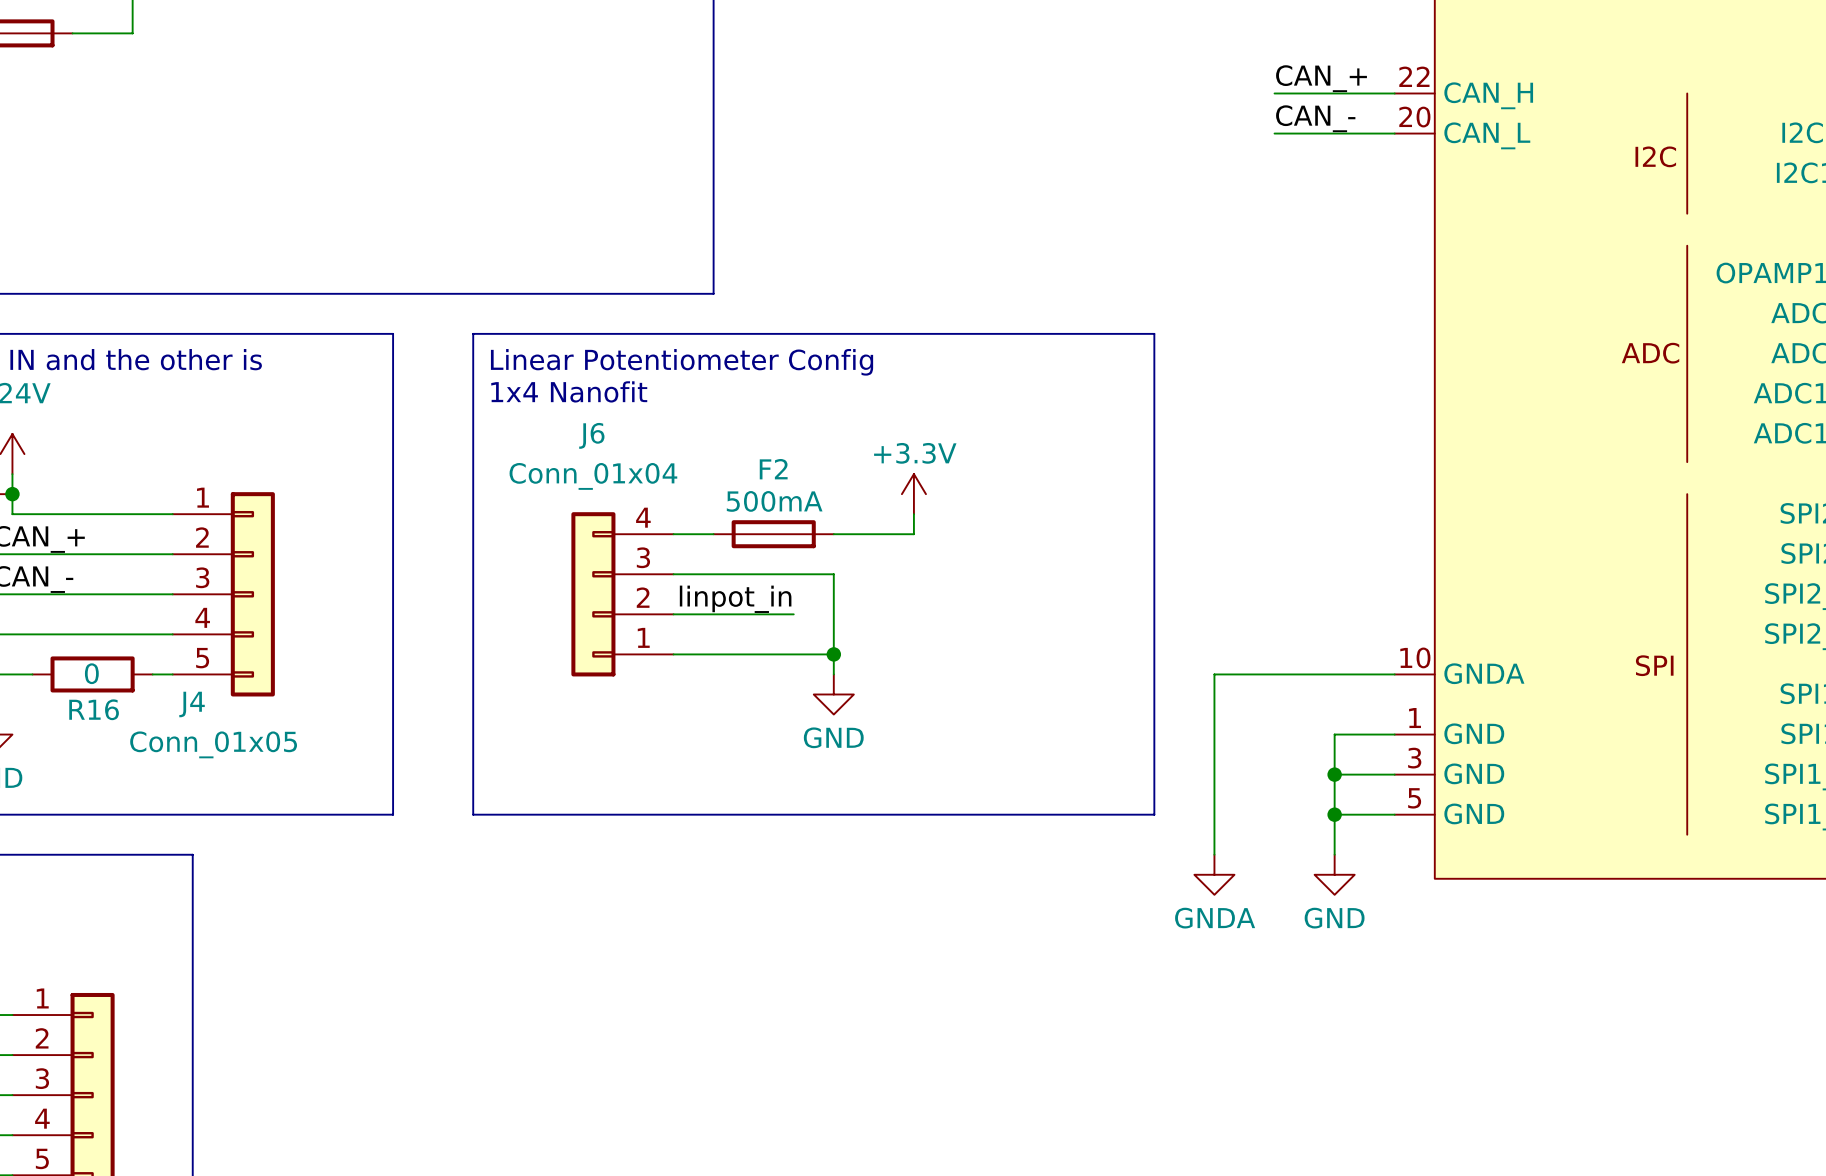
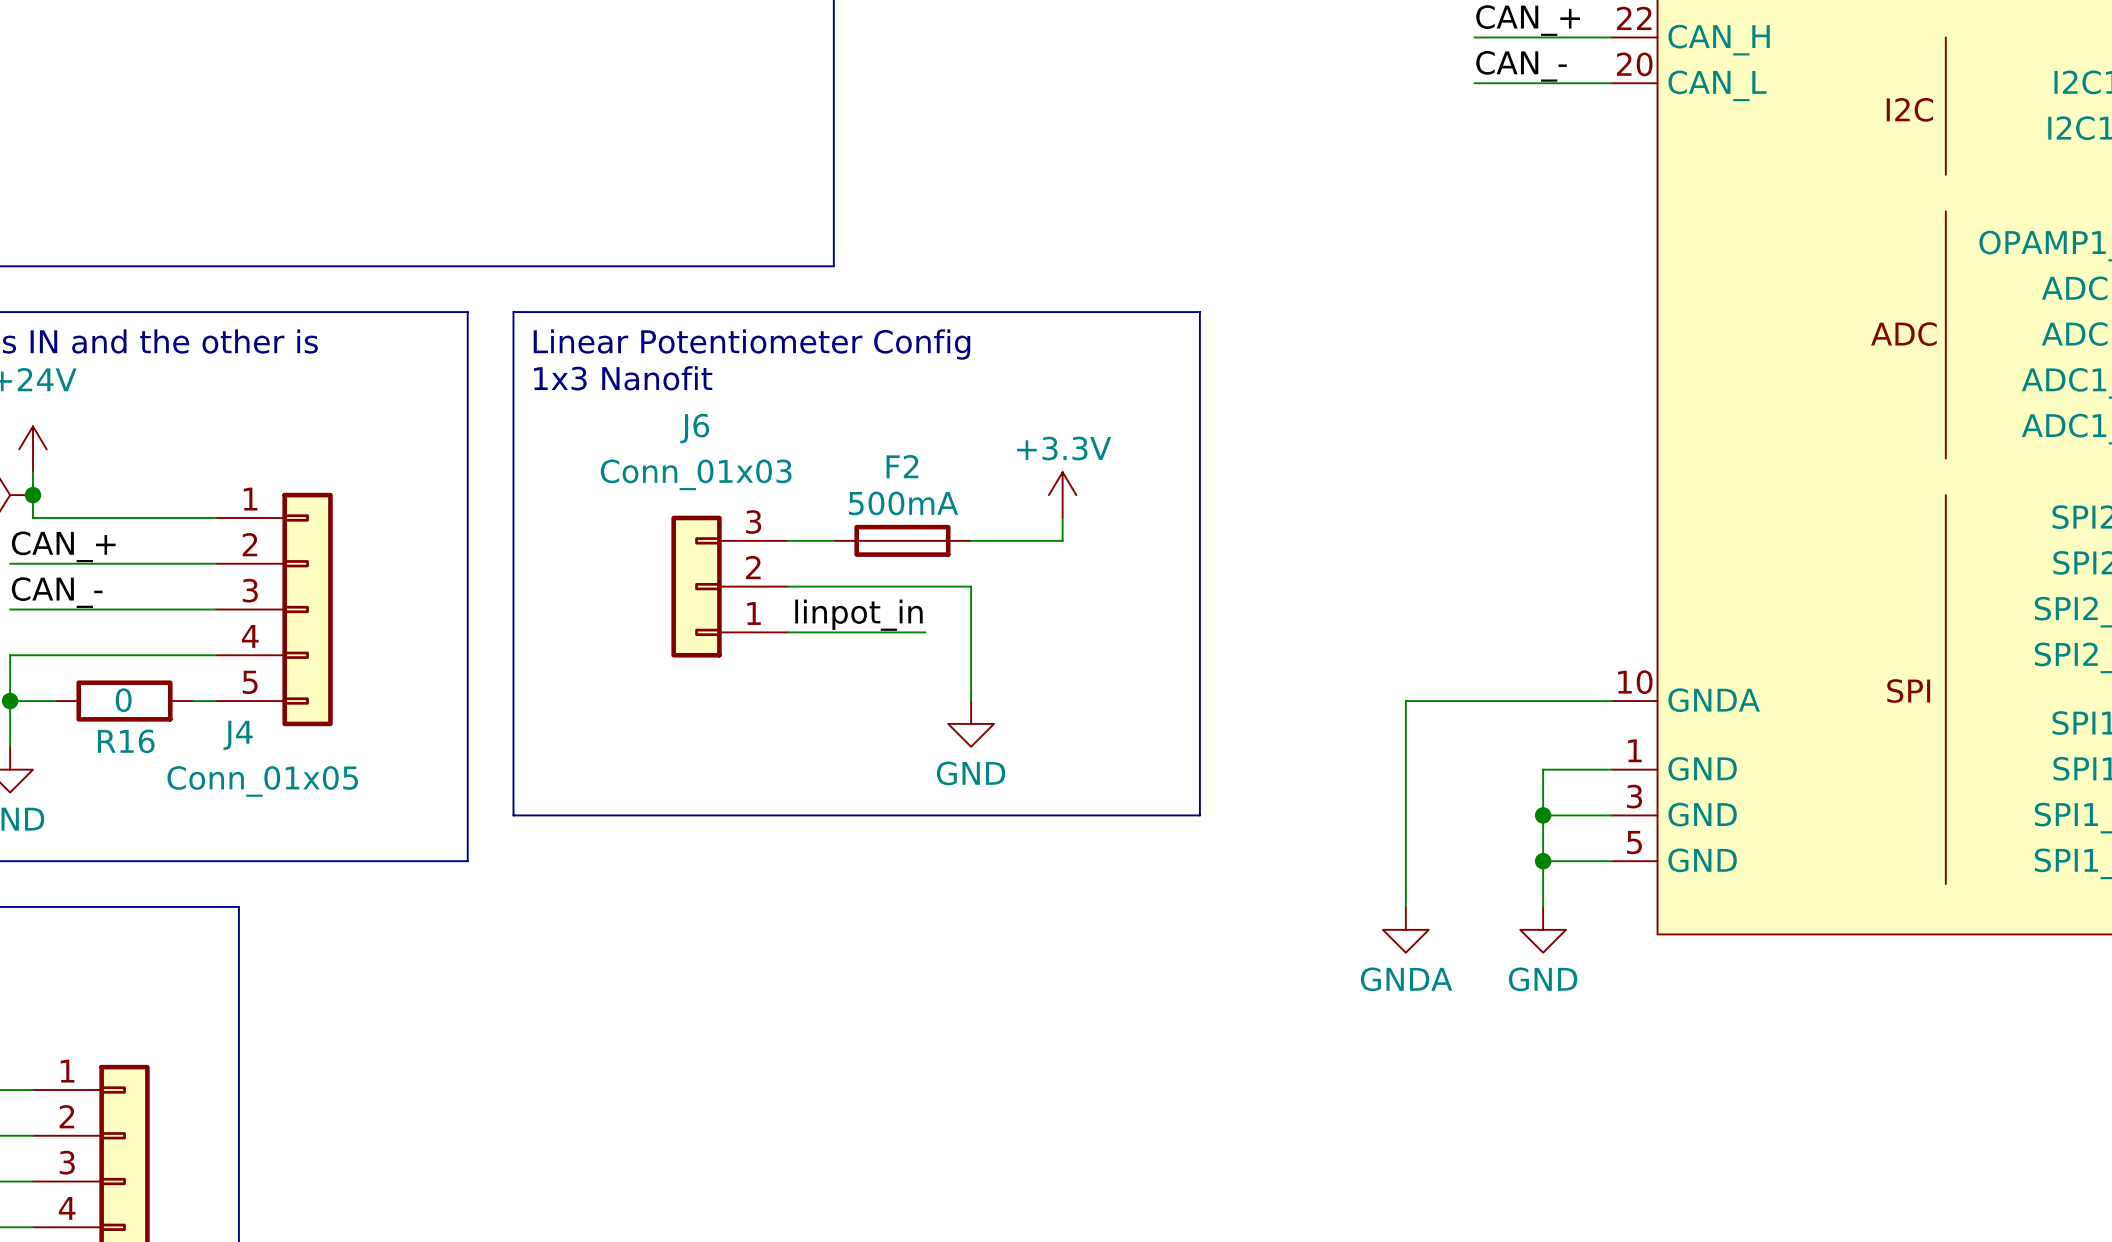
line: (473, 333) (473, 814) (1154, 814) (1154, 333) (1034, 333) -> (559, 312) (513, 312) (513, 815) (1199, 815) (1199, 312)
text position: Linear Potentiometer Config (682, 362) -> Linear Potentiometer Config (751, 344)
text: 1x4 Nanofit (569, 391) -> 1x3 Nanofit (623, 378)
J6 value: Conn_01x04 (593, 476) -> Conn_01x03 (696, 474)
J6 symbol: [571, 512, 674, 677] -> [671, 515, 789, 658]
wire: (673, 654) (833, 654) -> none
junction: (833, 654) -> none

